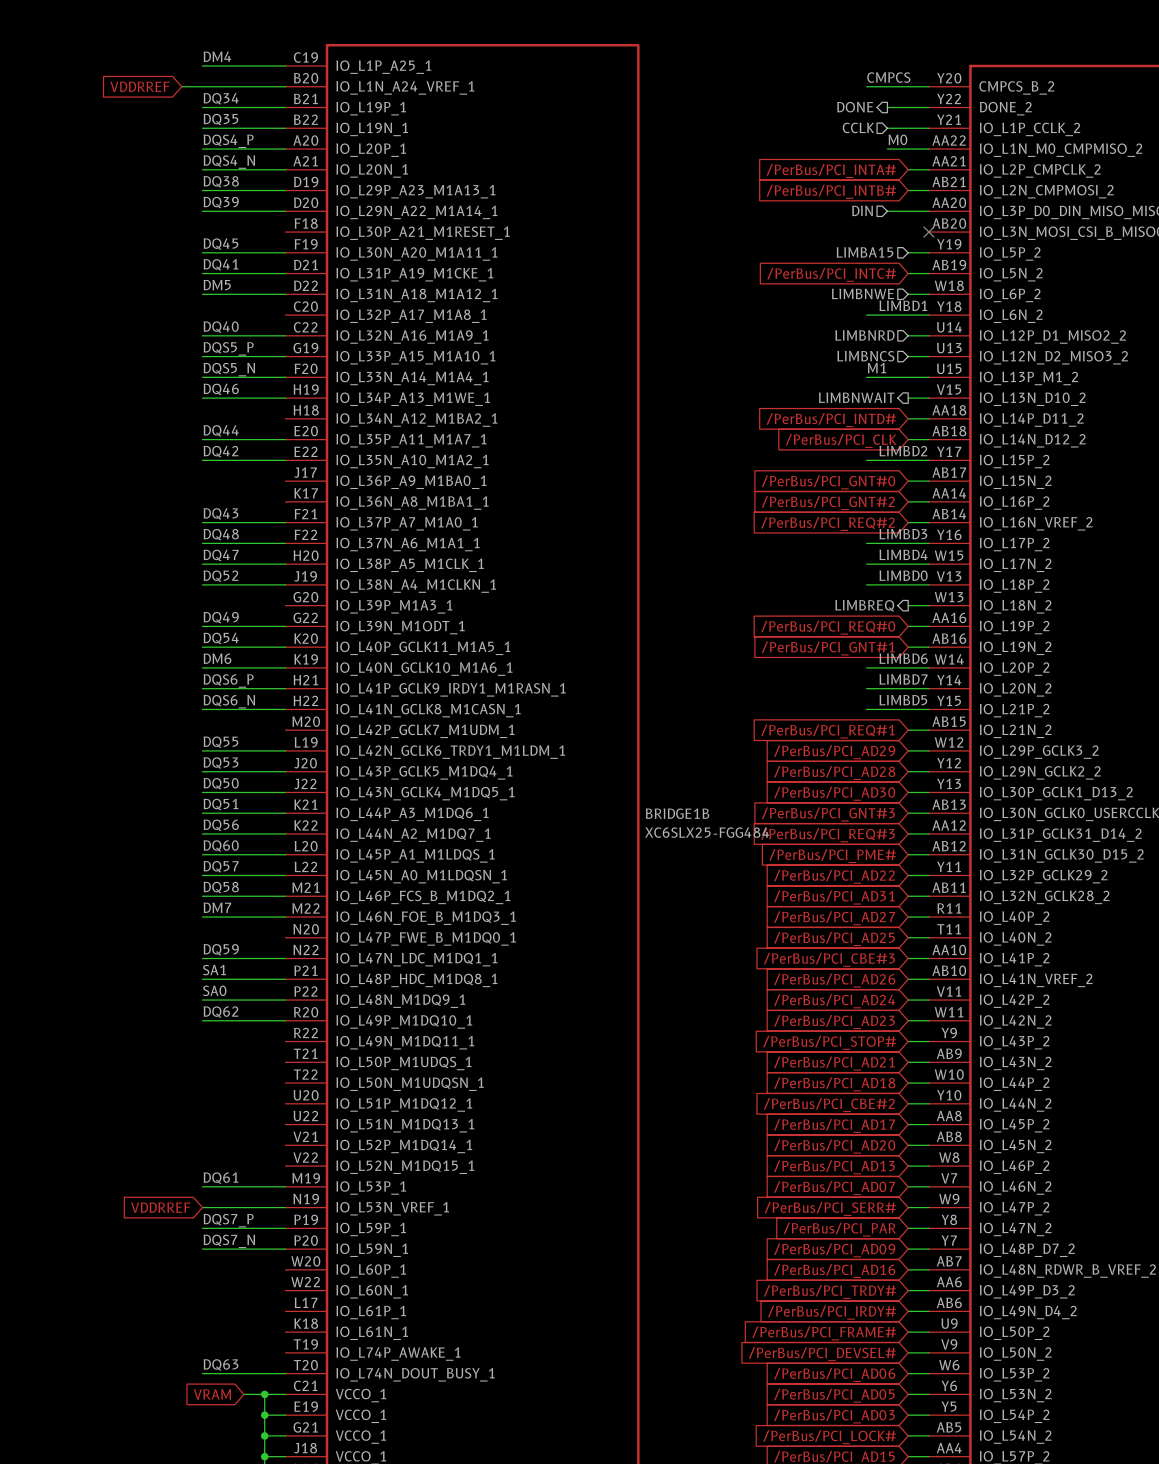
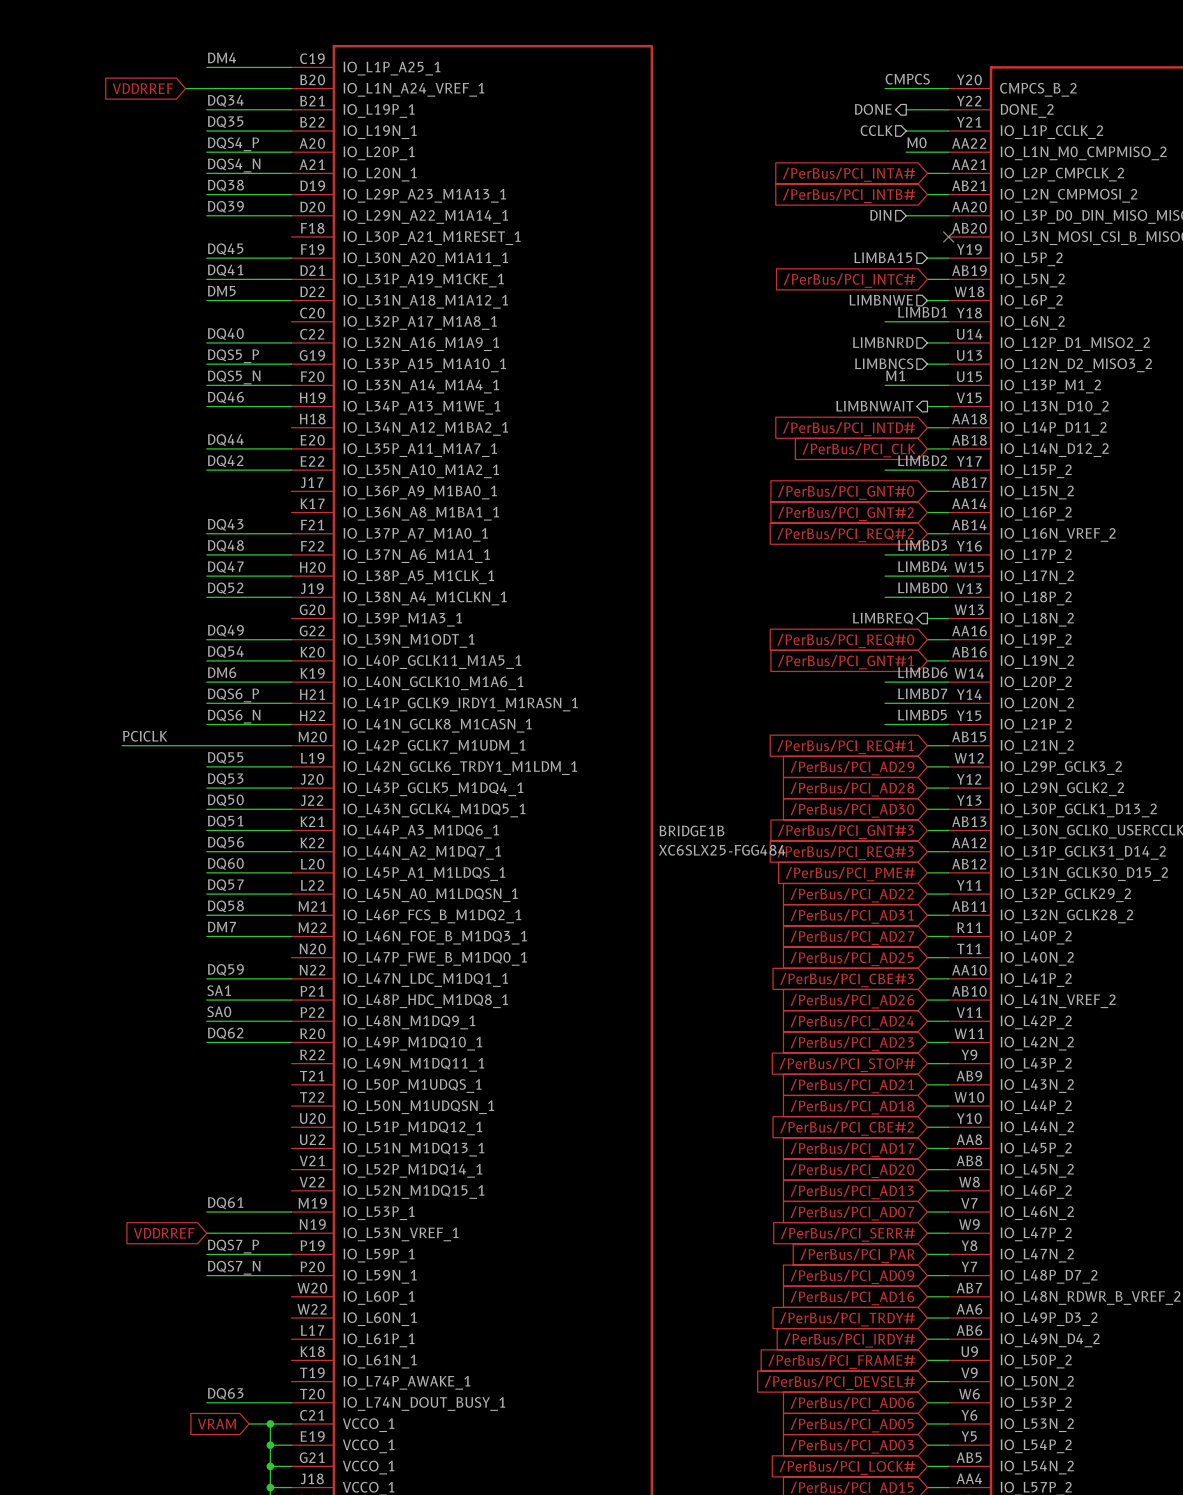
label: none -> PCICLK (145, 736)
wire: none -> (121, 745) (291, 745)

